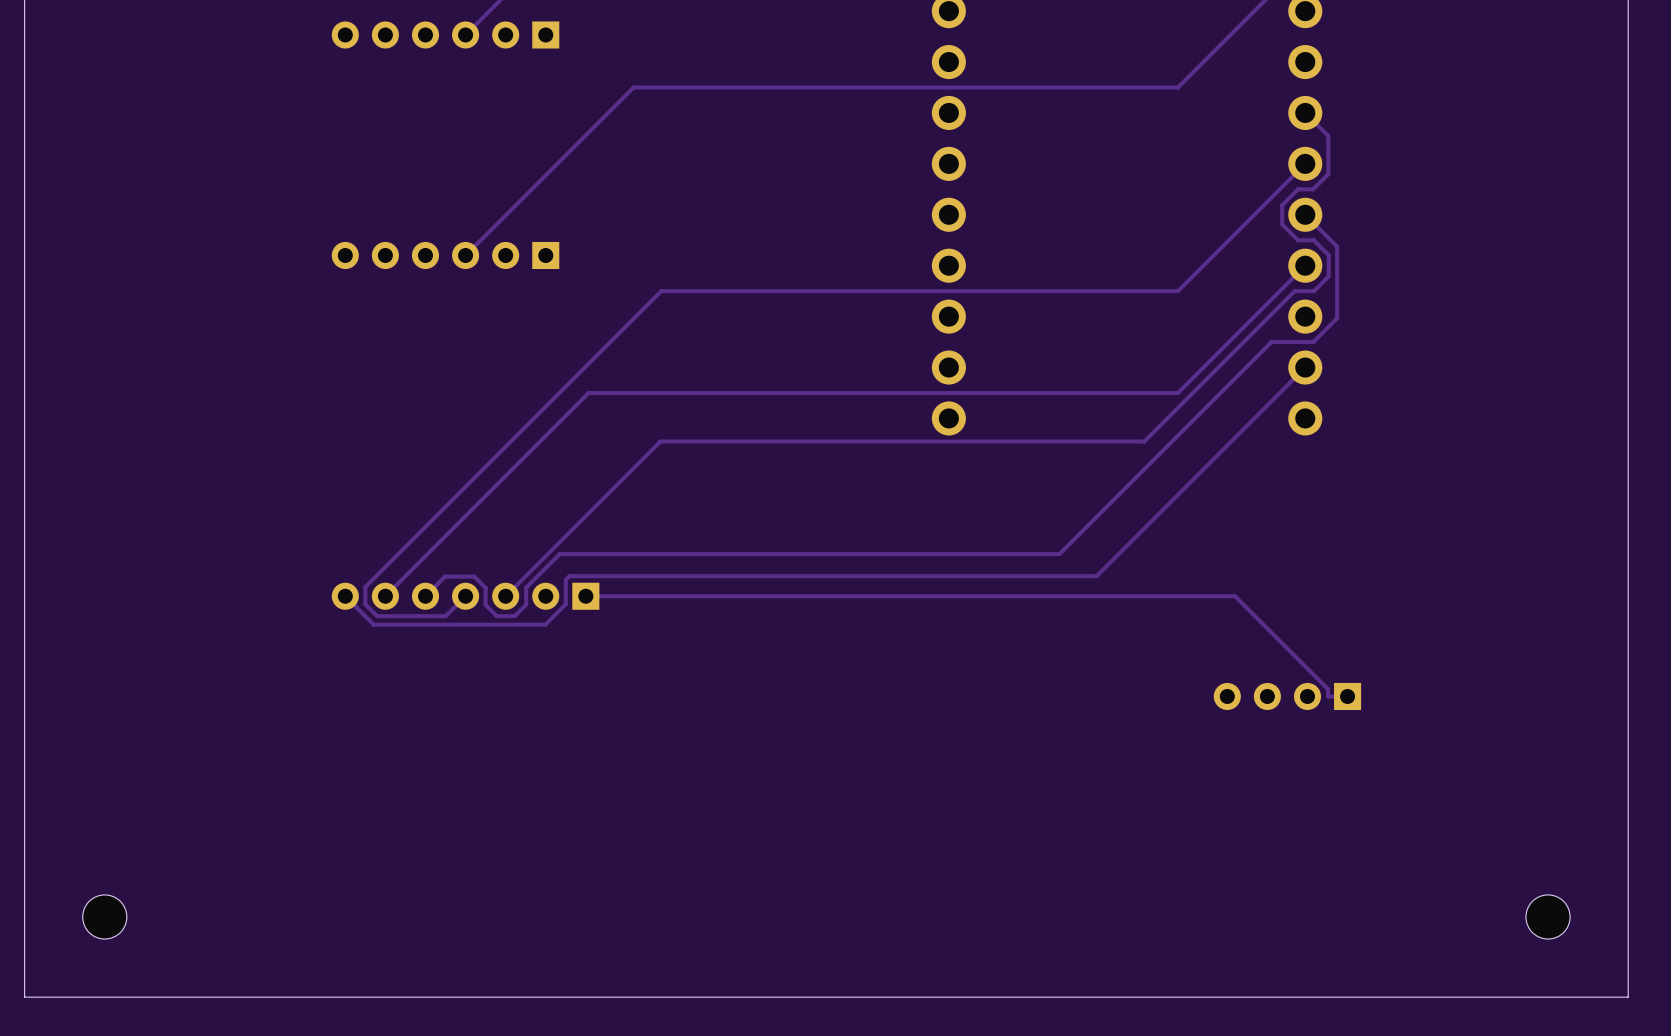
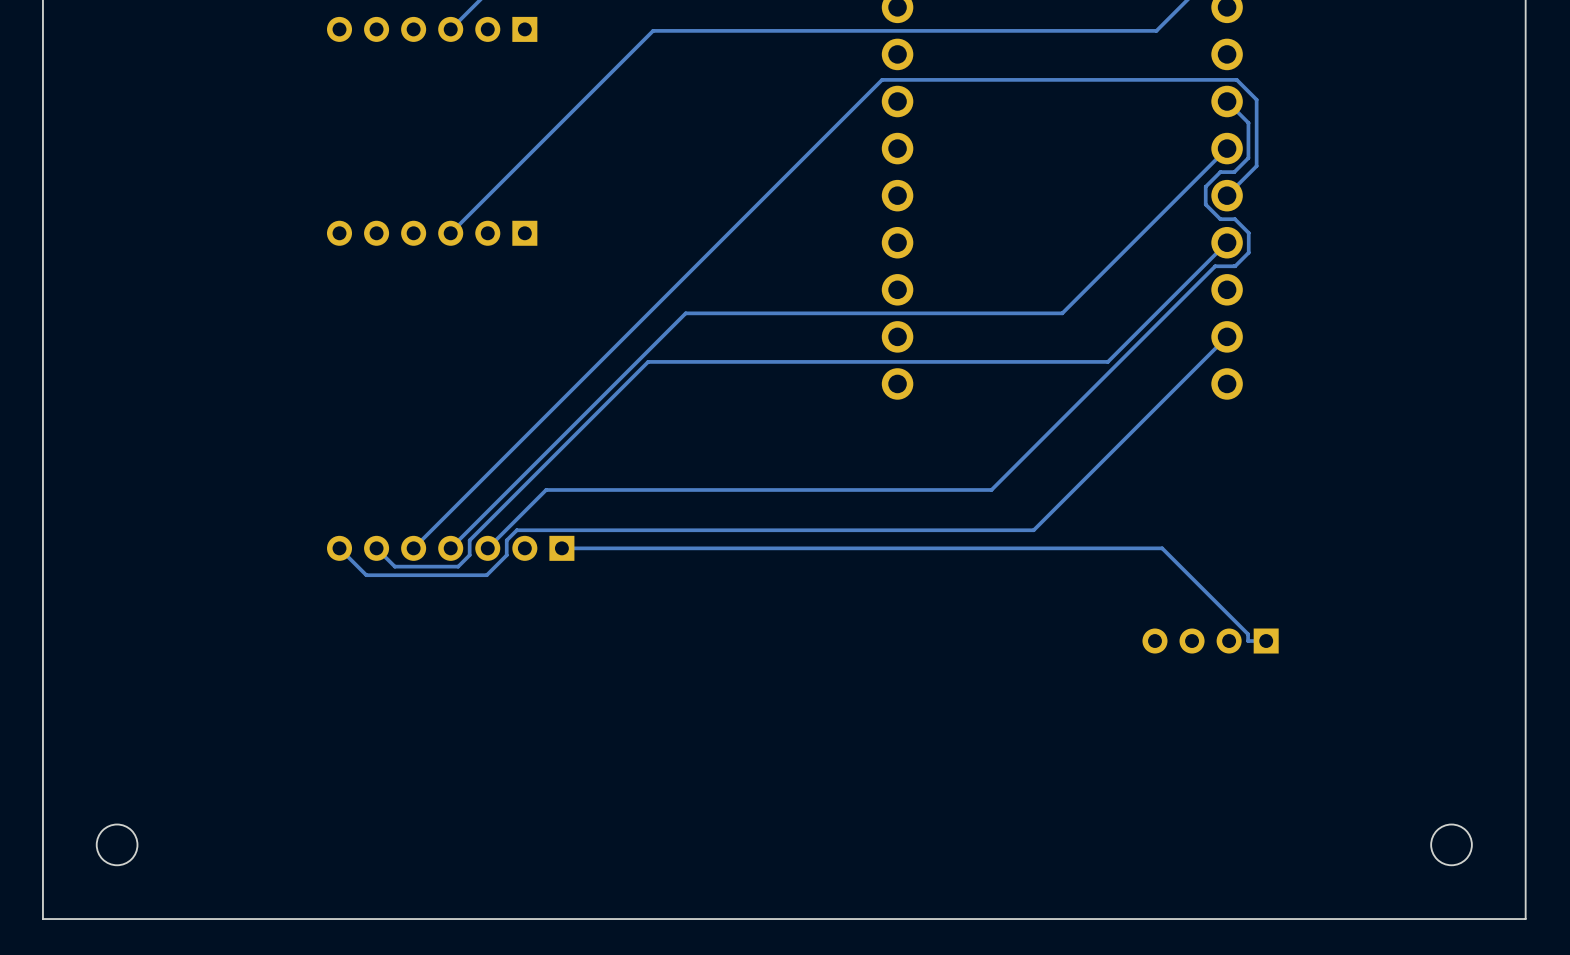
track: (1228, 36) (1177, 87) (633, 87) -> (1156, 30) (653, 30) (606, 77)
track: (1305, 214) (1337, 246) (1337, 318) (1313, 342) (1271, 342) (1059, 554) (559, 554) (537, 576) -> (1227, 195) (1256, 166) (1256, 99) (1236, 79) (882, 79) (431, 530)
track: (1177, 291) (661, 291) (365, 587) (365, 604) (377, 616) (445, 616) (465, 596) -> (1109, 266) (1062, 313) (685, 313) (450, 548)
track: (1294, 291) (1144, 441) (660, 441) (568, 533) -> (1217, 266) (991, 489) (546, 489)
track: (1177, 392) (588, 392) (385, 596) -> (1109, 360) (648, 361) (469, 540) (469, 555) (458, 566) (394, 566) (376, 548)
track: (445, 576) (474, 576) (485, 587) (485, 604) (496, 616) (514, 616) (526, 603) -> (365, 574) (486, 575) (506, 555)
track: (1096, 576) (569, 576) (565, 579) (565, 604) (545, 624) (373, 624) -> (1034, 529) (516, 530)

